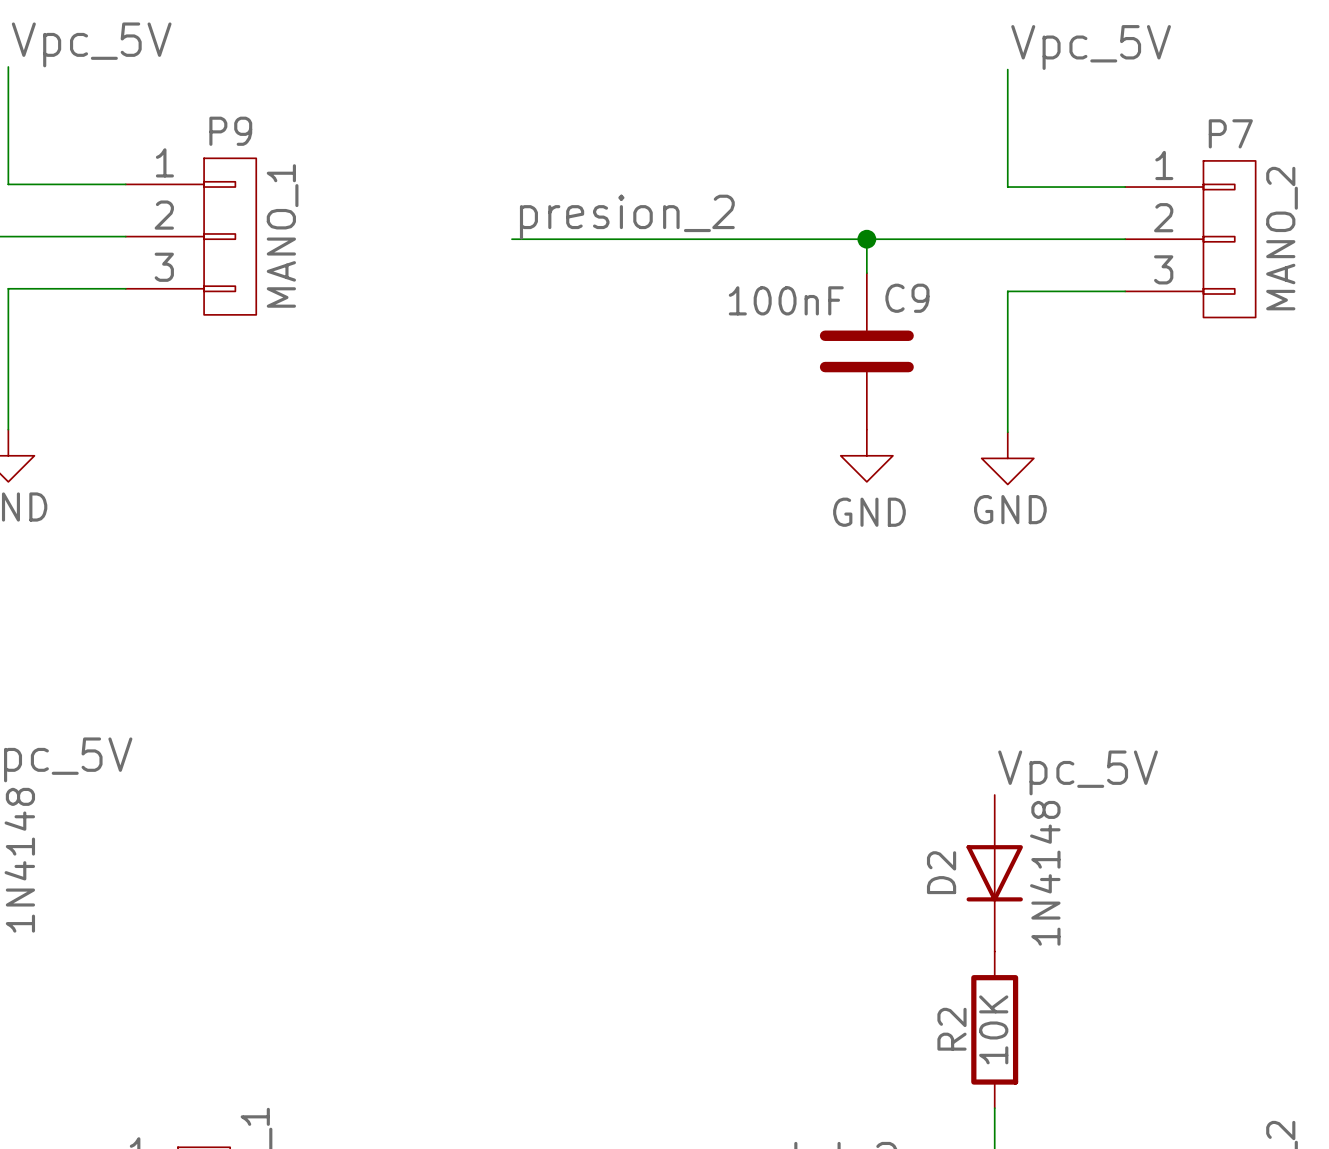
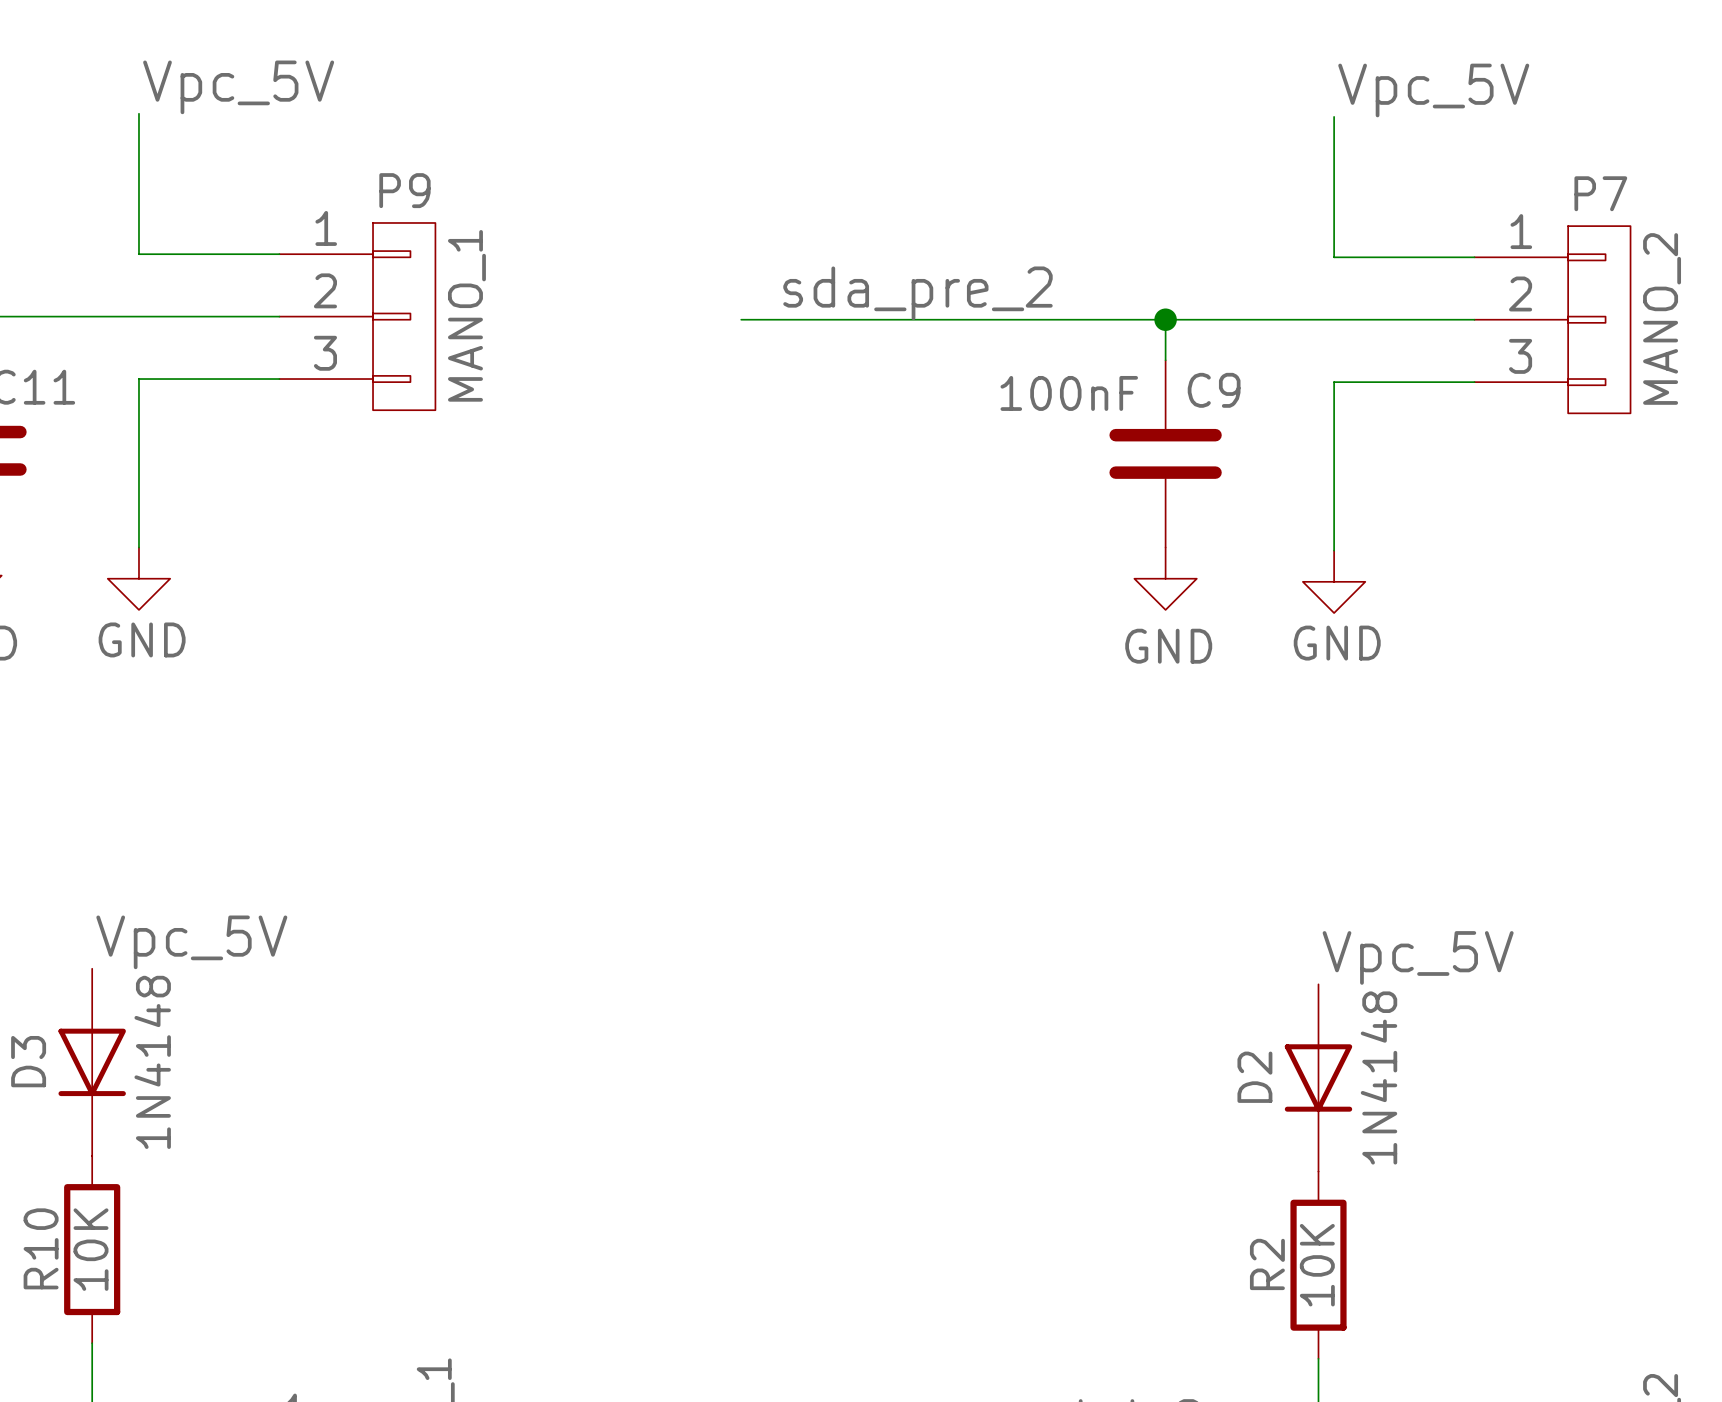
label: presion_2 (627, 217) -> none
label: none -> sda_pre_2 (917, 293)

